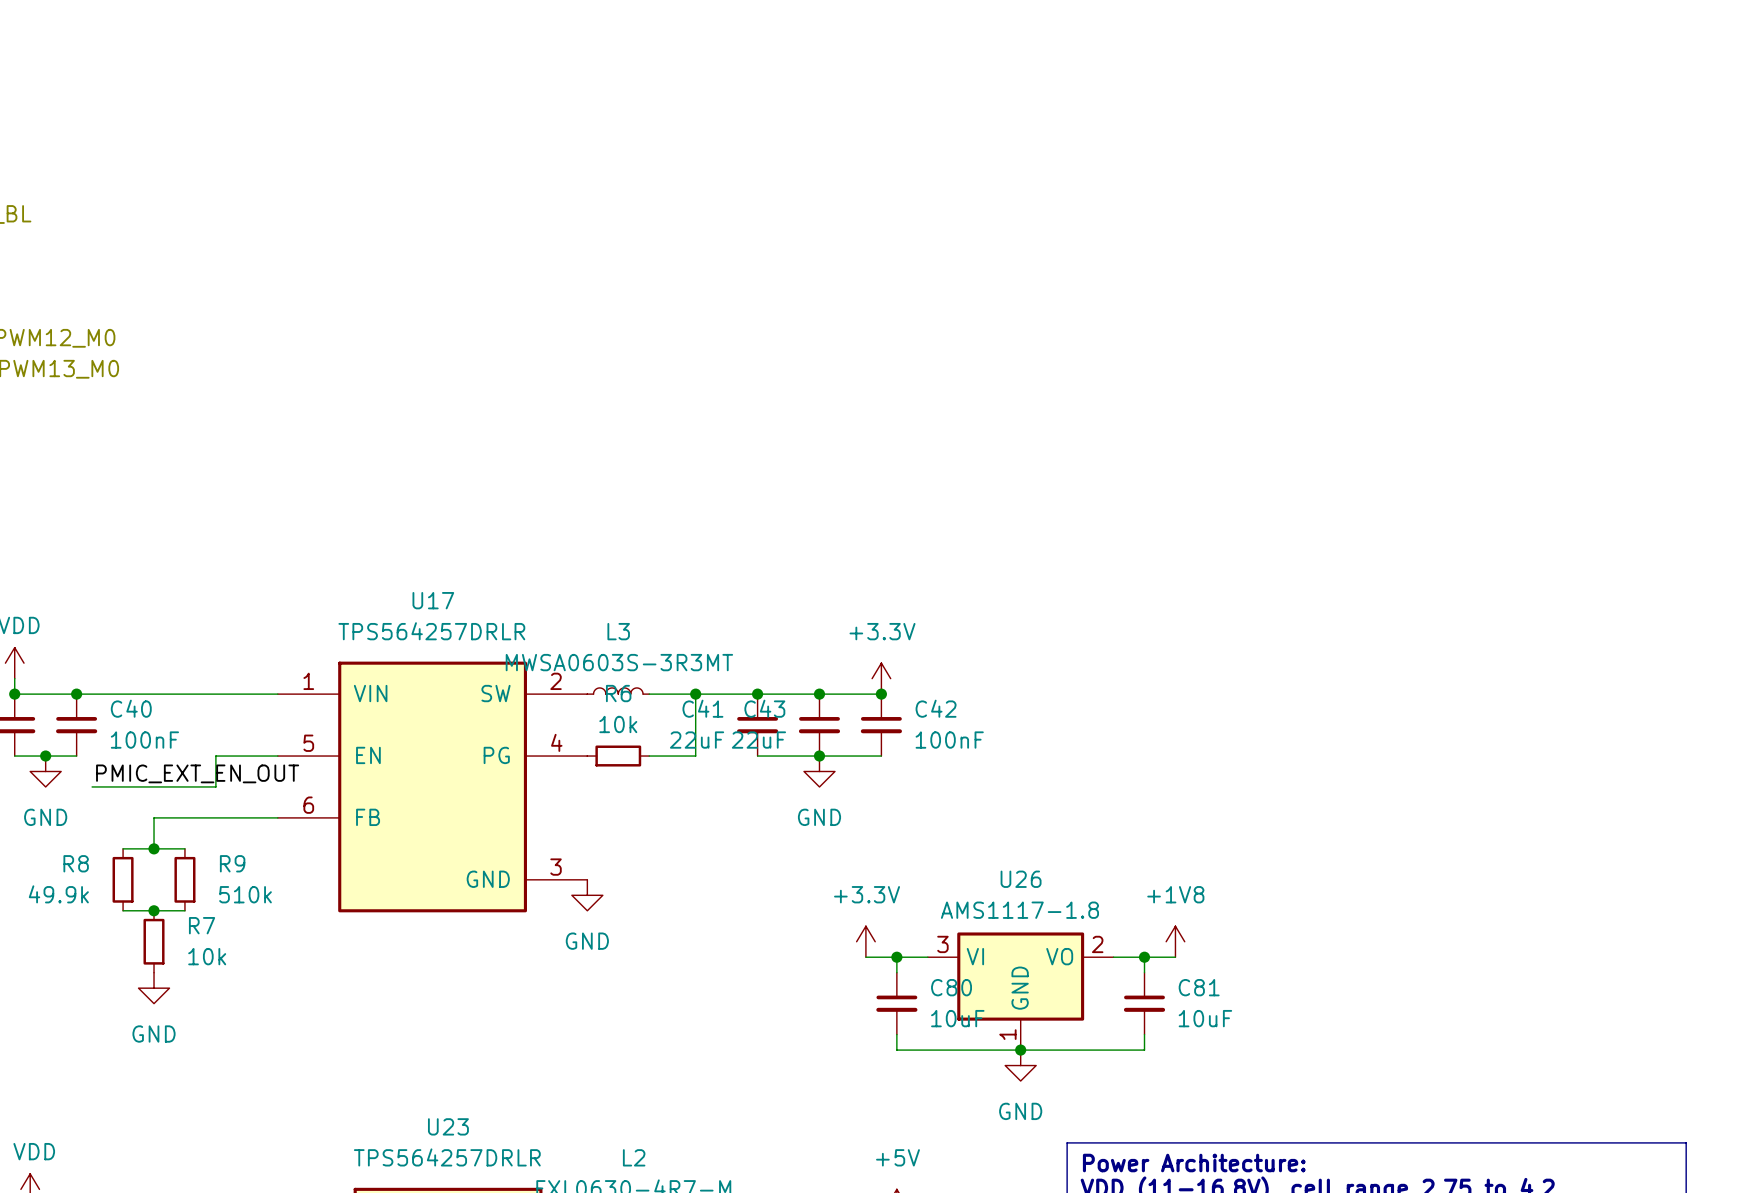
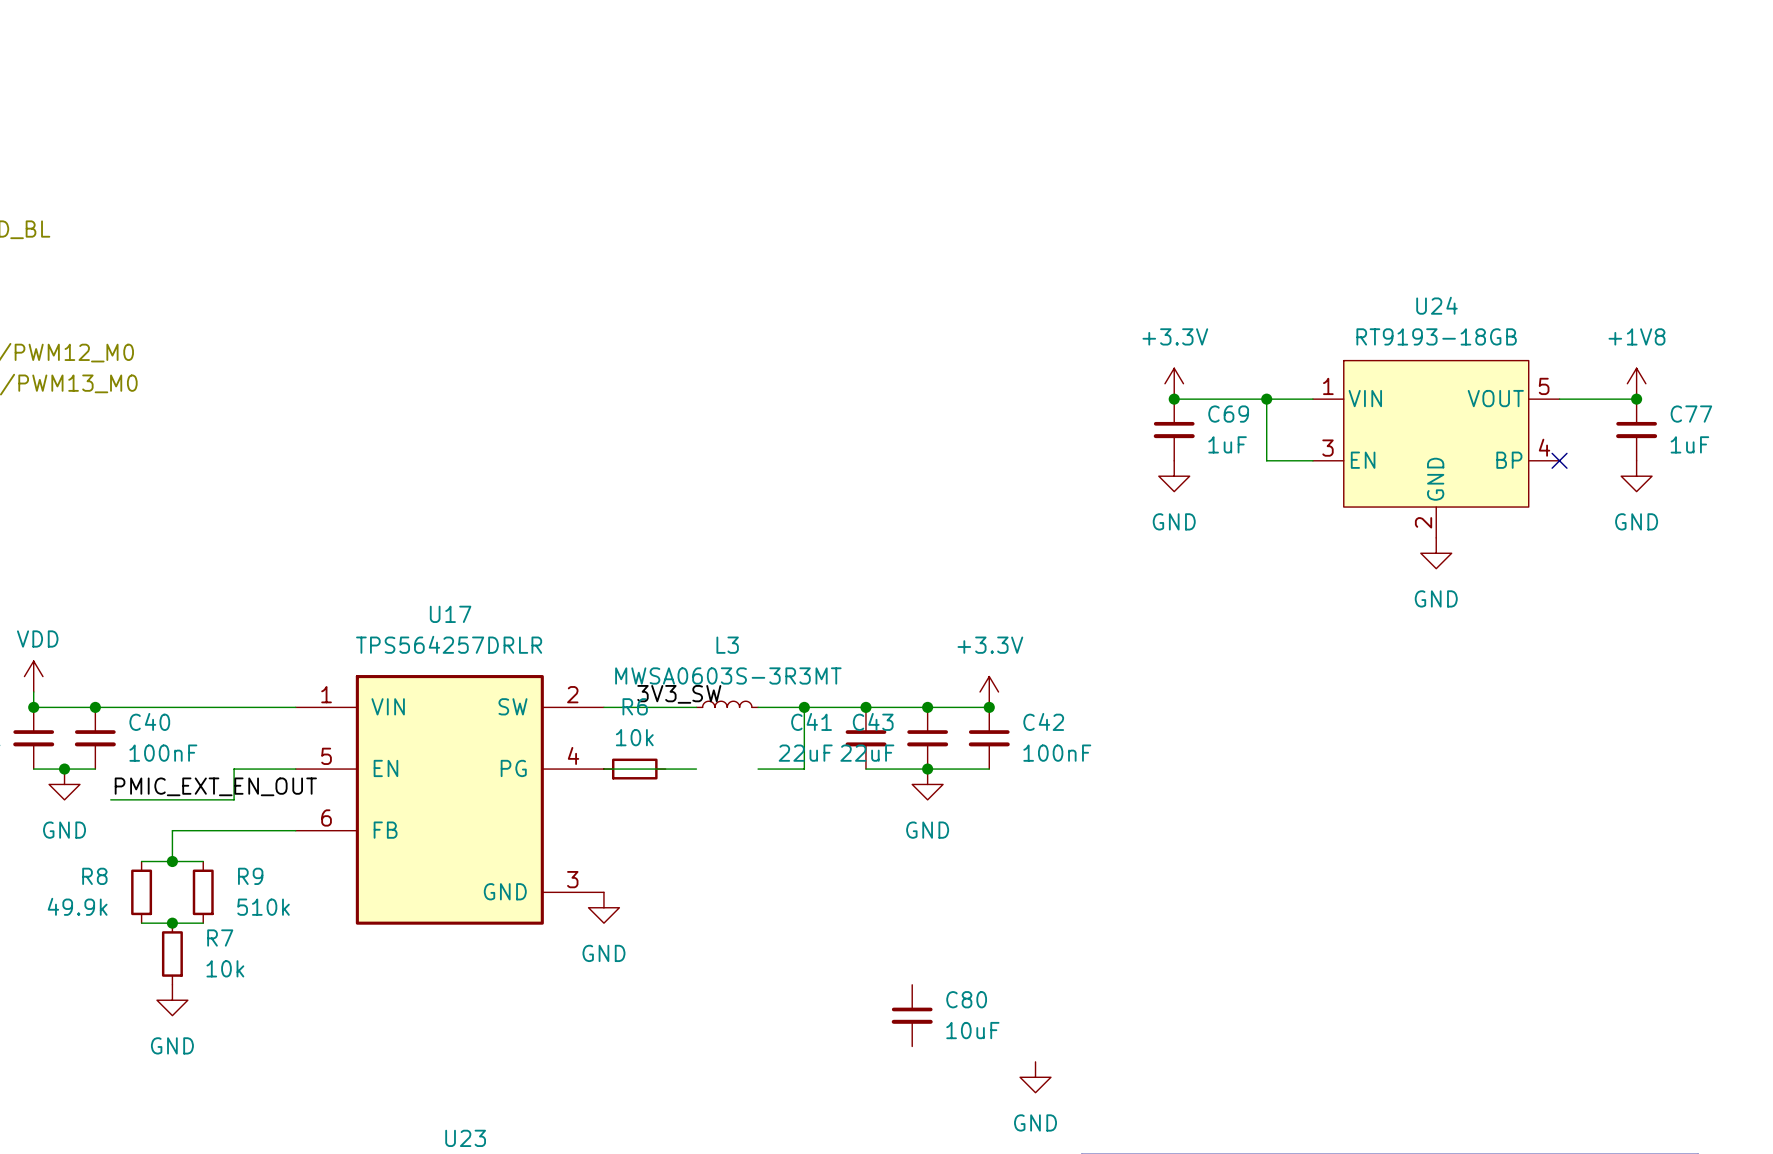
power symbol: none -> +3.3V (1174, 383)
power symbol: none -> +1V8 (1636, 383)
wire: none -> (1174, 399) (1312, 399)
junction: none -> (1174, 399)
wire: none -> (1266, 399) (1266, 460) (1312, 460)
junction: none -> (1266, 399)
wire: none -> (1559, 399) (1636, 399)
junction: none -> (1636, 399)
C69: none -> 1uF (1174, 429)
C77: none -> 1uF (1636, 429)
U24: none -> RT9193-18GB (1436, 449)
no-connect mark: none -> (1559, 460)
power symbol: none -> GND (1174, 476)
power symbol: none -> GND (1636, 476)
power symbol: none -> GND (1436, 553)
power symbol position: +3.3V (881, 678) -> +3.3V (989, 691)
label: none -> 3V3_SW (679, 694)
L3 position: (618, 691) -> (727, 704)
wire: (680, 694) (742, 694) -> (603, 707) (665, 707)
wire: (695, 694) (695, 756) (680, 756) -> none
junction: (695, 694) -> none
junction: (757, 694) -> none
junction: none -> (804, 707)
junction: (819, 694) -> none
junction: none -> (865, 707)
wire: none -> (896, 707) (989, 707)
junction: (881, 694) -> none
junction: none -> (927, 707)
junction: none -> (989, 707)
C41 position: (757, 725) -> (865, 738)
C43 position: (819, 725) -> (927, 738)
C42 position: (881, 725) -> (989, 738)
wire: none -> (603, 769) (665, 769)
wire: none -> (758, 769) (773, 769)
wire: (788, 756) (850, 756) -> (804, 769) (804, 707)
junction: (819, 756) -> none
wire: none -> (896, 769) (989, 769)
junction: none -> (927, 769)
power symbol position: GND (819, 771) -> GND (927, 784)
power symbol: +3.3V (865, 941) -> none
power symbol: +1V8 (1175, 941) -> none
wire: (865, 957) (927, 957) -> none
wire: (896, 957) (896, 972) -> none
junction: (896, 957) -> none
wire: (1113, 957) (1175, 957) -> none
wire: (1144, 957) (1144, 972) -> none
junction: (1144, 957) -> none
U26: AMS1117-1.8 (1020, 991) -> none
C81: 10uF (1144, 1003) -> none
wire: (896, 1034) (896, 1050) (1144, 1050) (1144, 1034) -> none
junction: (1020, 1050) -> none

